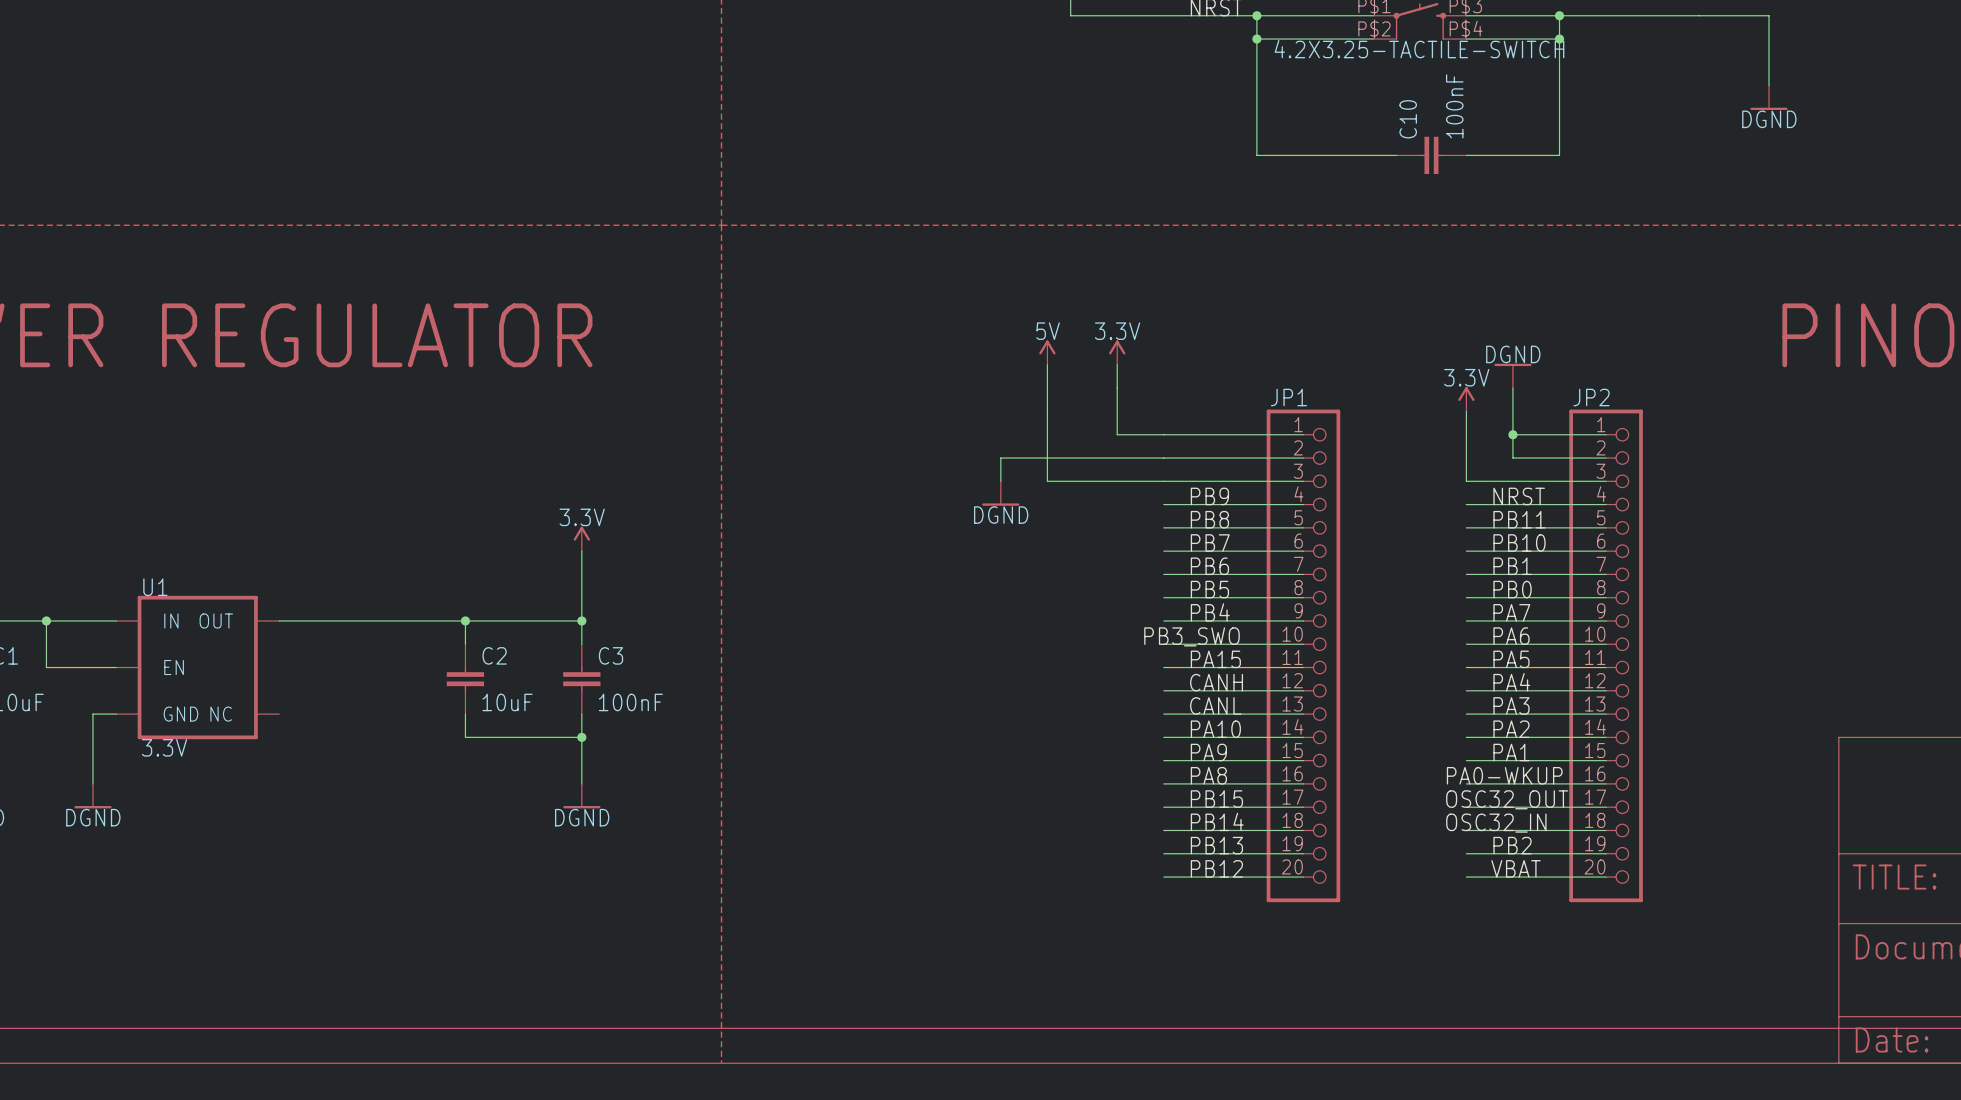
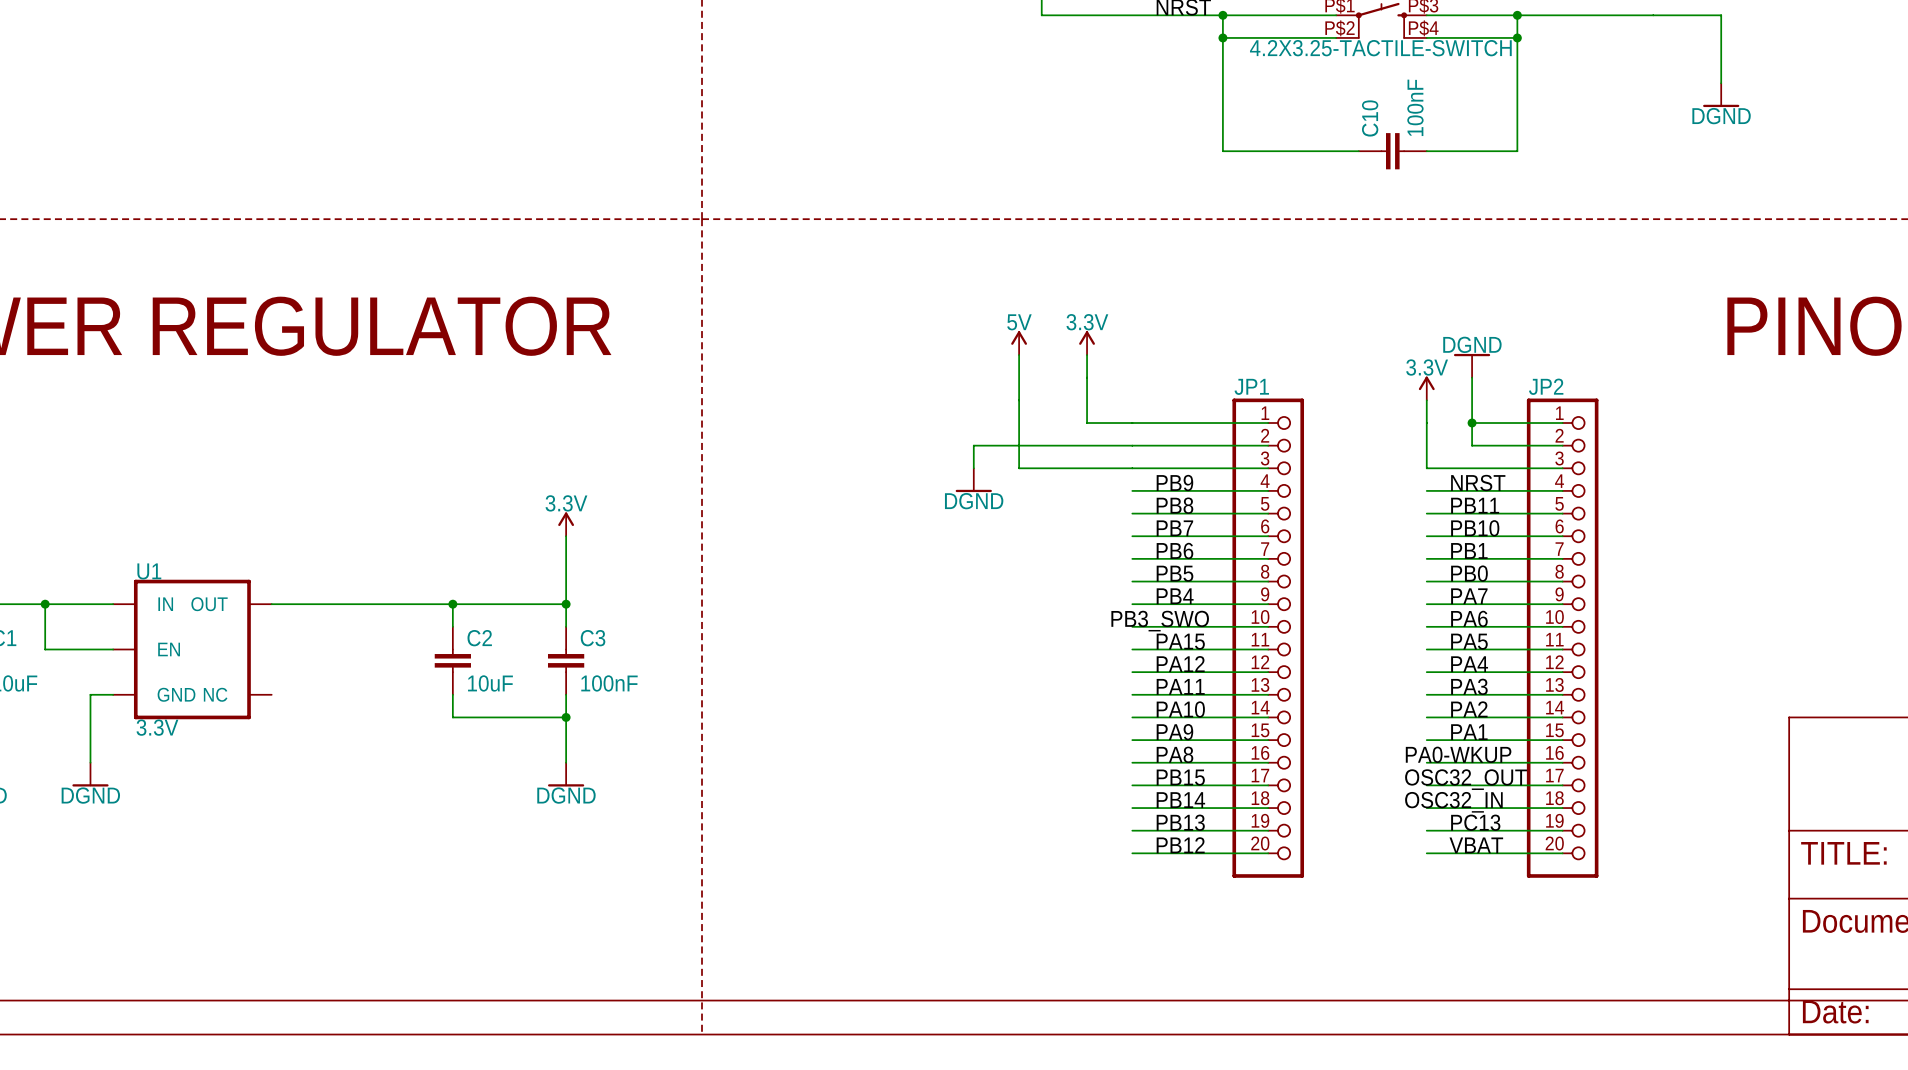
label: CANH (1216, 682) -> PA12 (1180, 664)
label: CANL (1215, 705) -> PA11 (1180, 686)
label: PB2 (1512, 845) -> PC13 (1475, 822)

